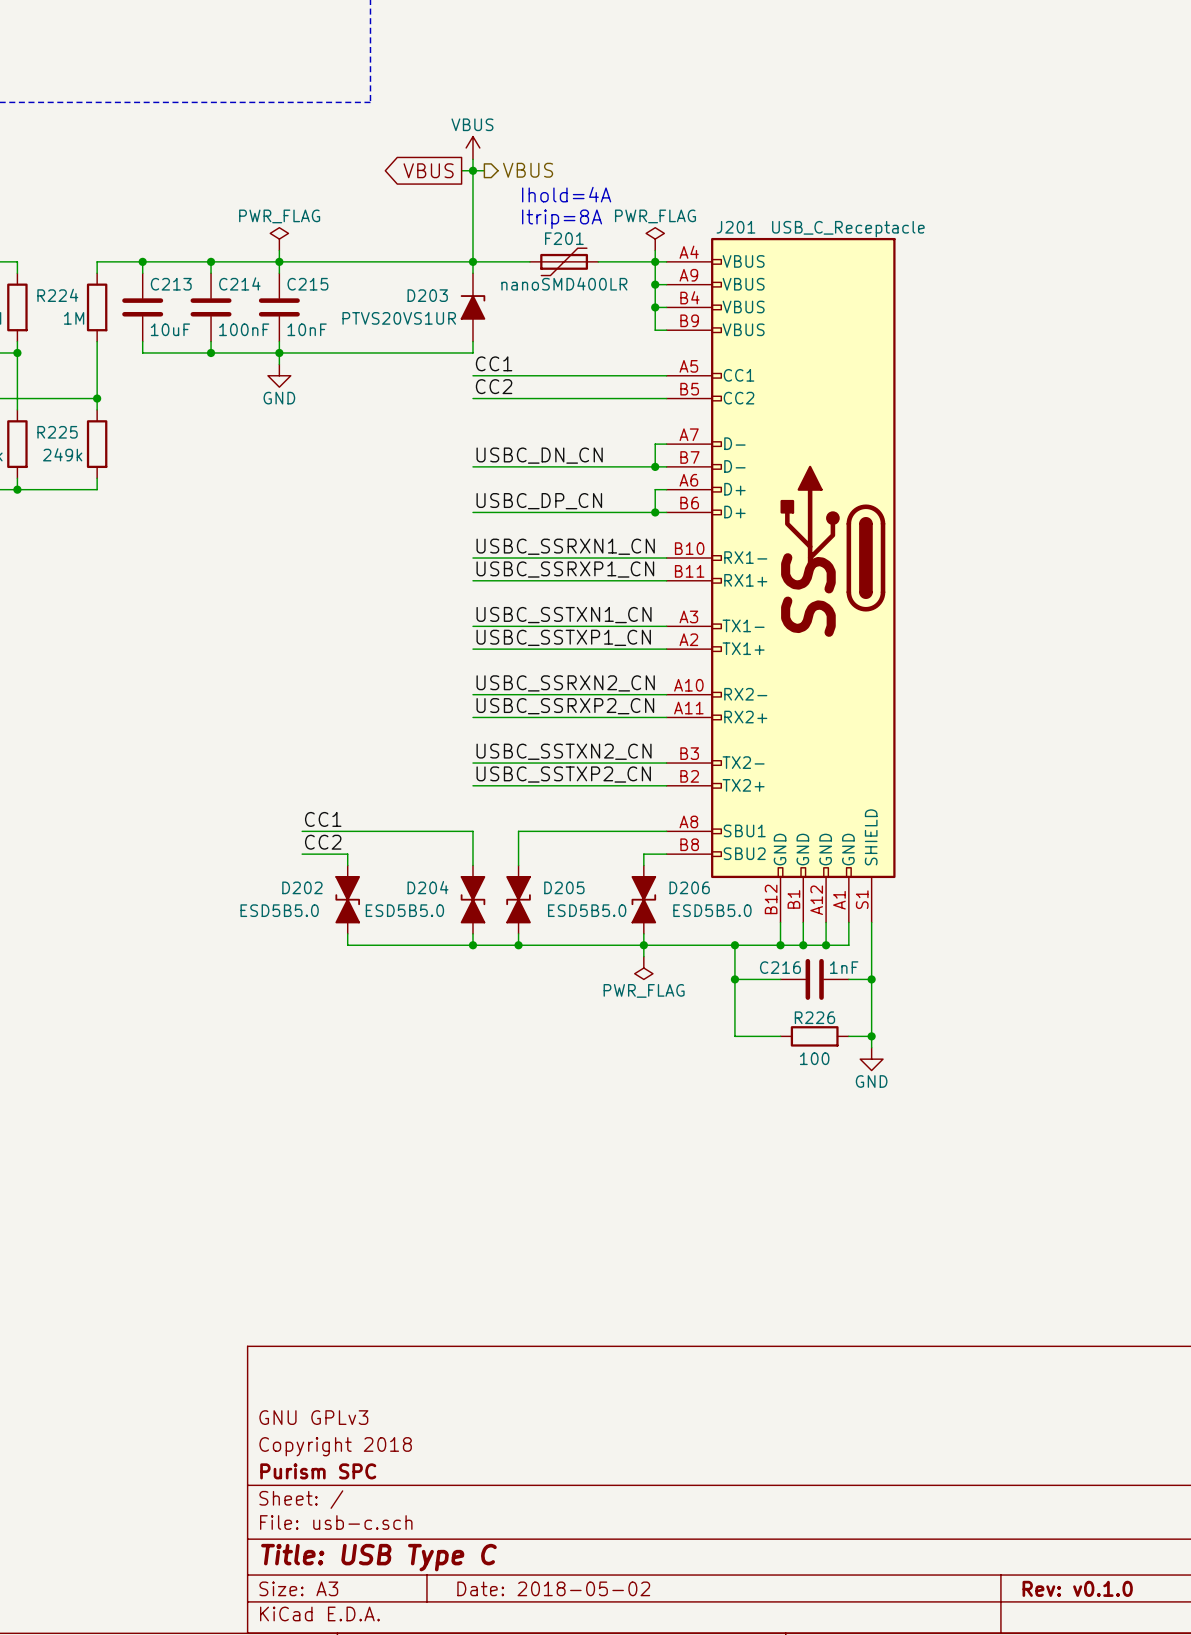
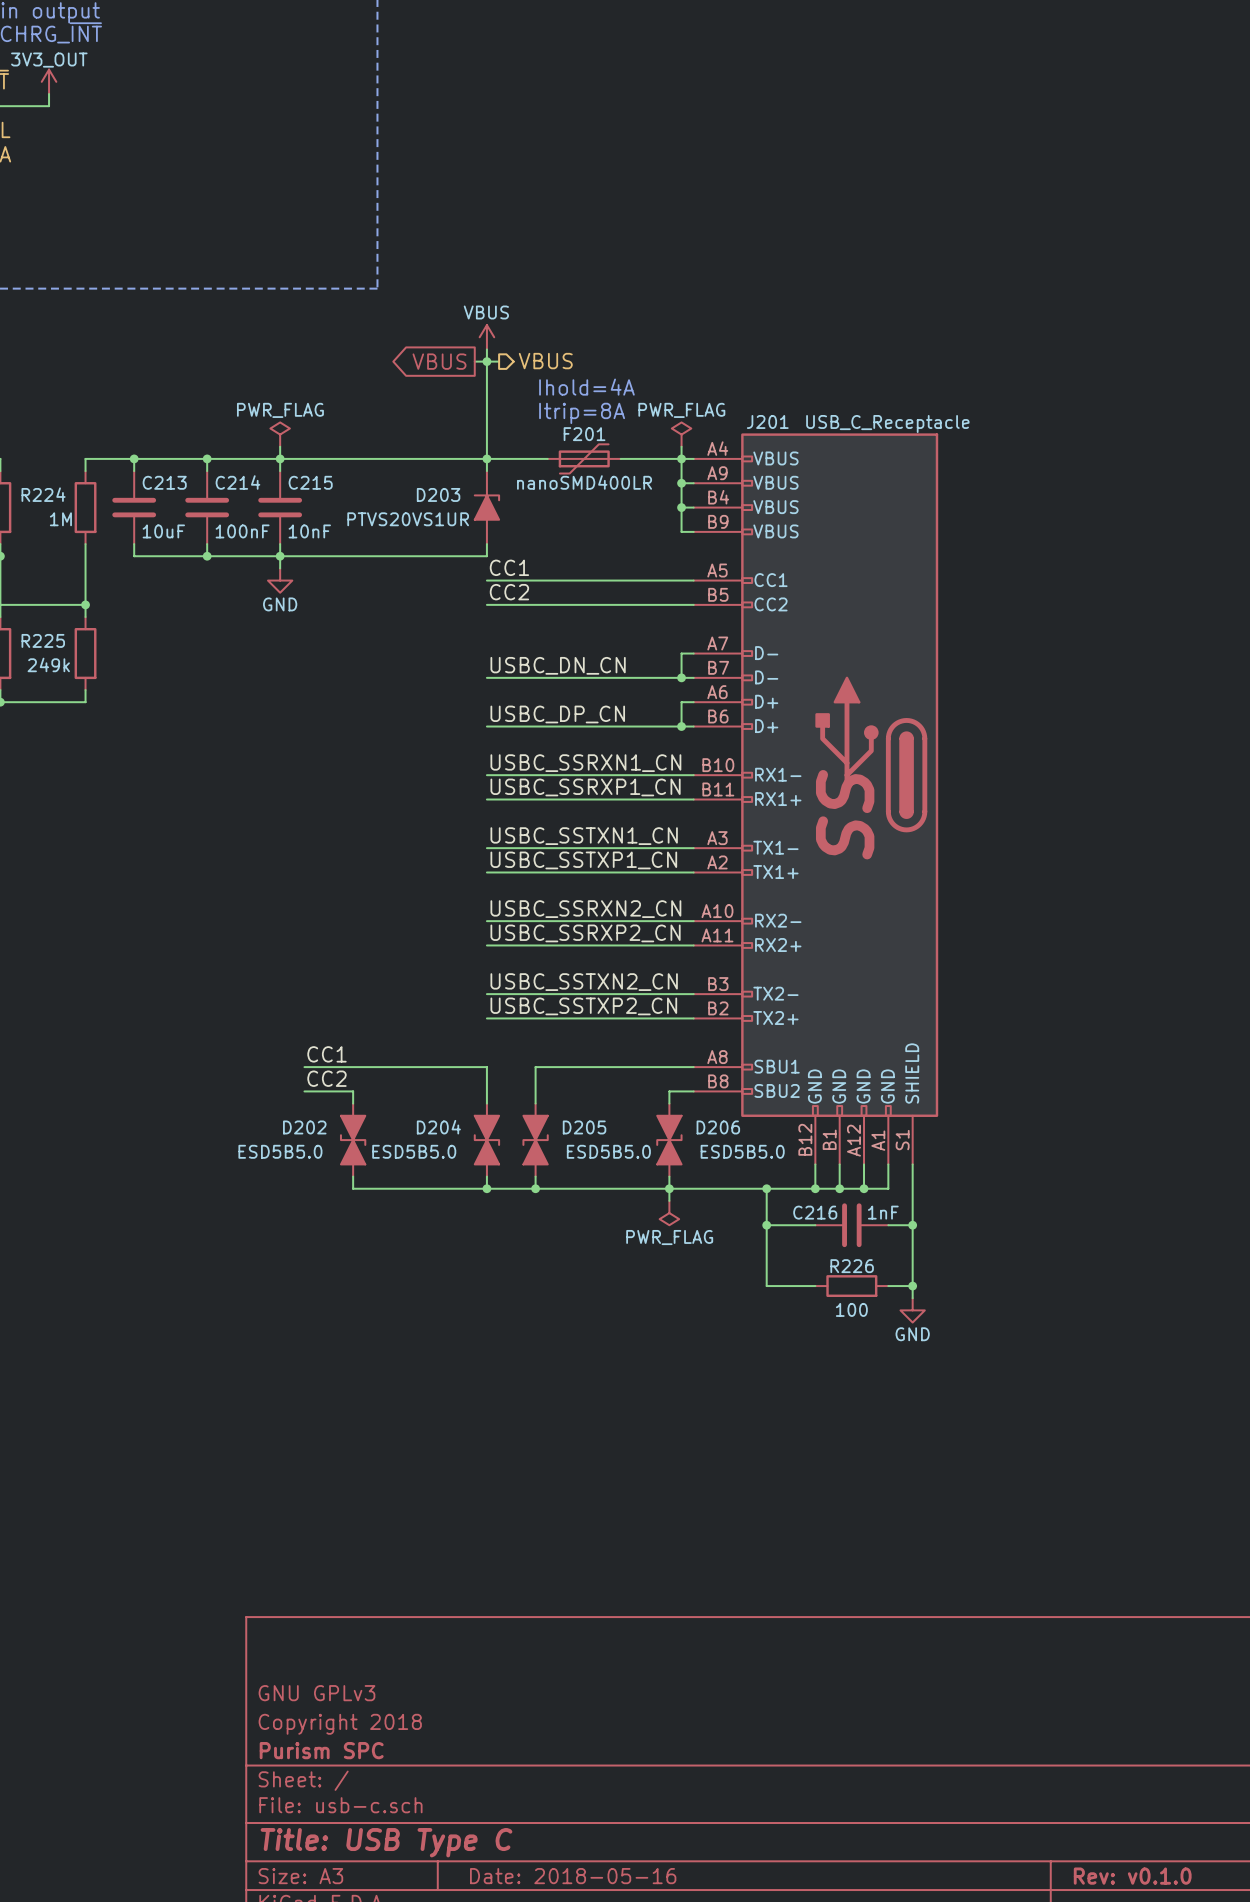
title block: Date: 2018-05-02 (553, 1588) -> Date: 2018-05-16 (573, 1876)

